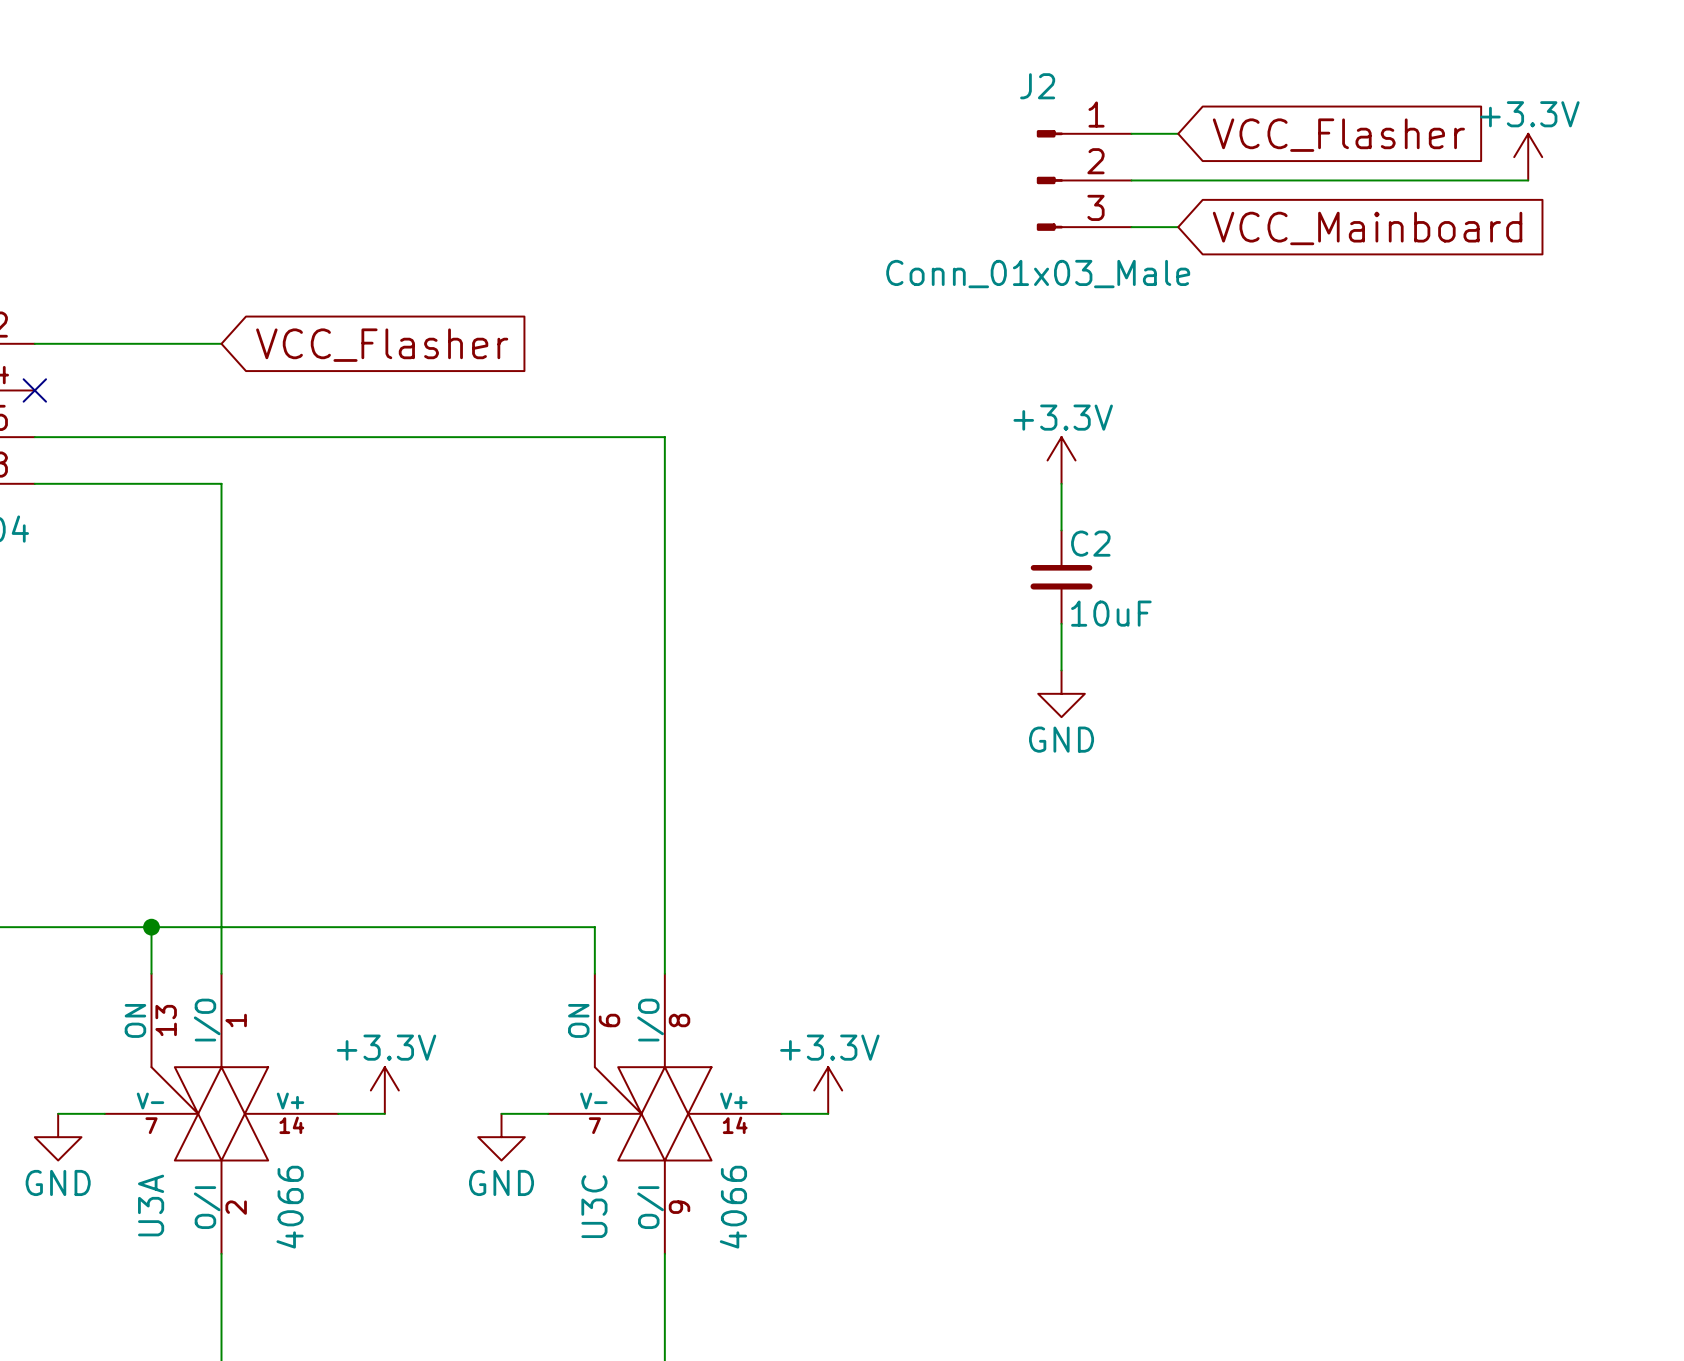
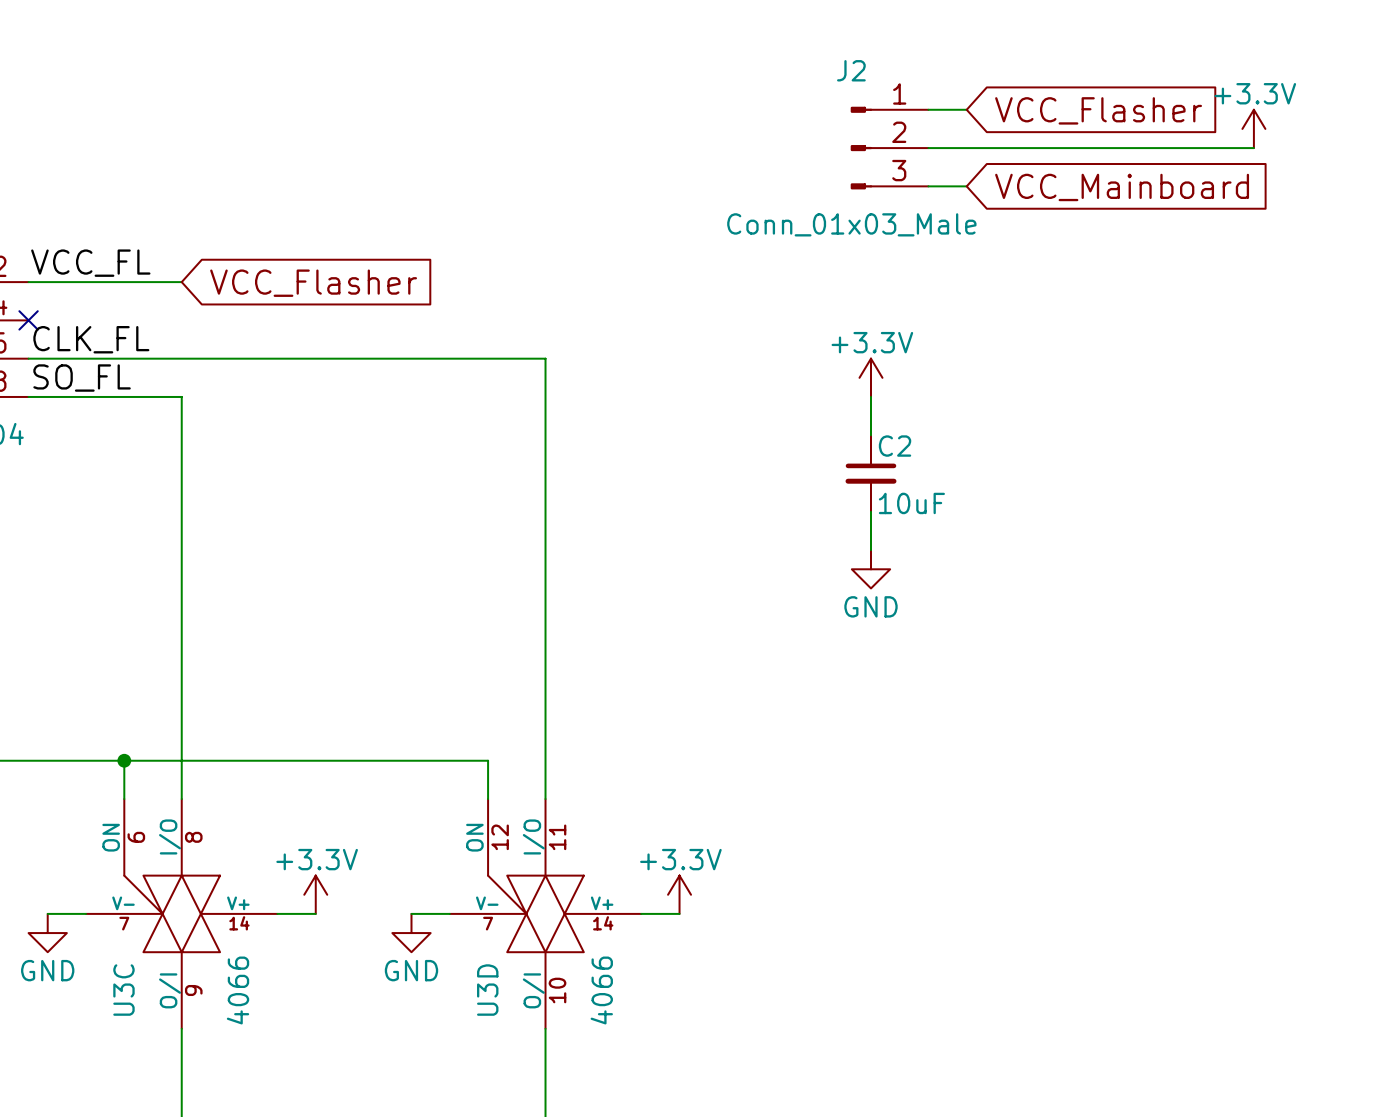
label: none -> VCC_FL (90, 263)
label: none -> CLK_FL (91, 339)
label: none -> SO_FL (82, 378)
U3A: 4066 (221, 1113) -> none
U3C position: (664, 1113) -> (181, 913)
U3D: none -> 4066 (545, 913)

